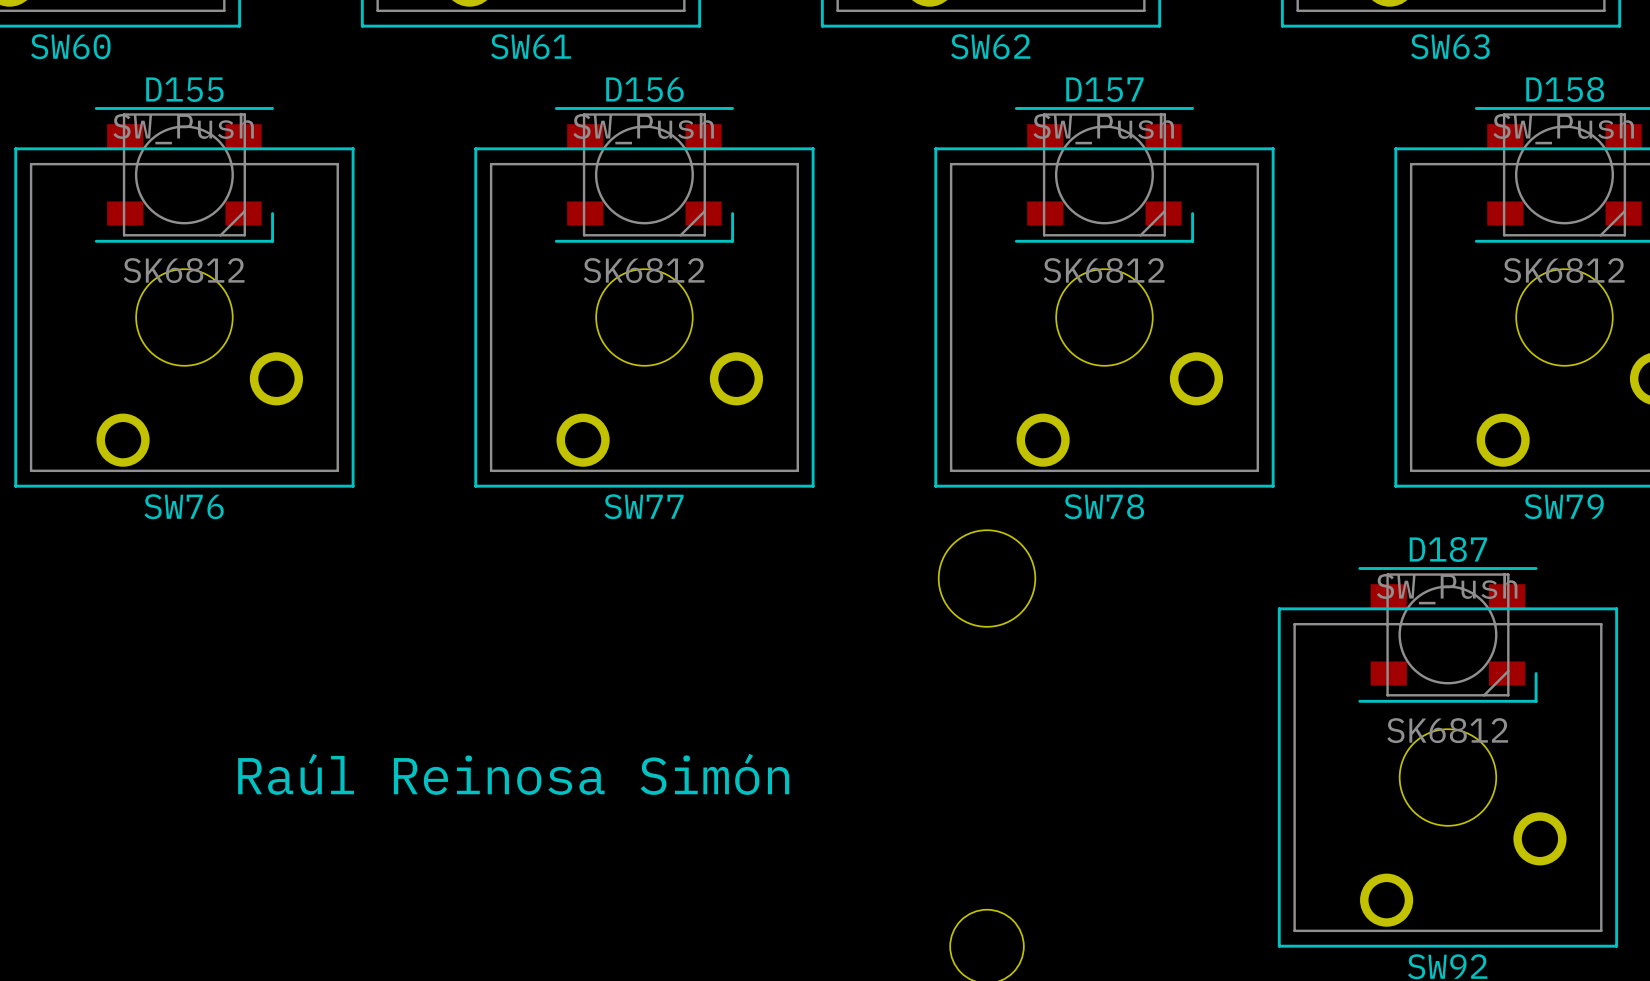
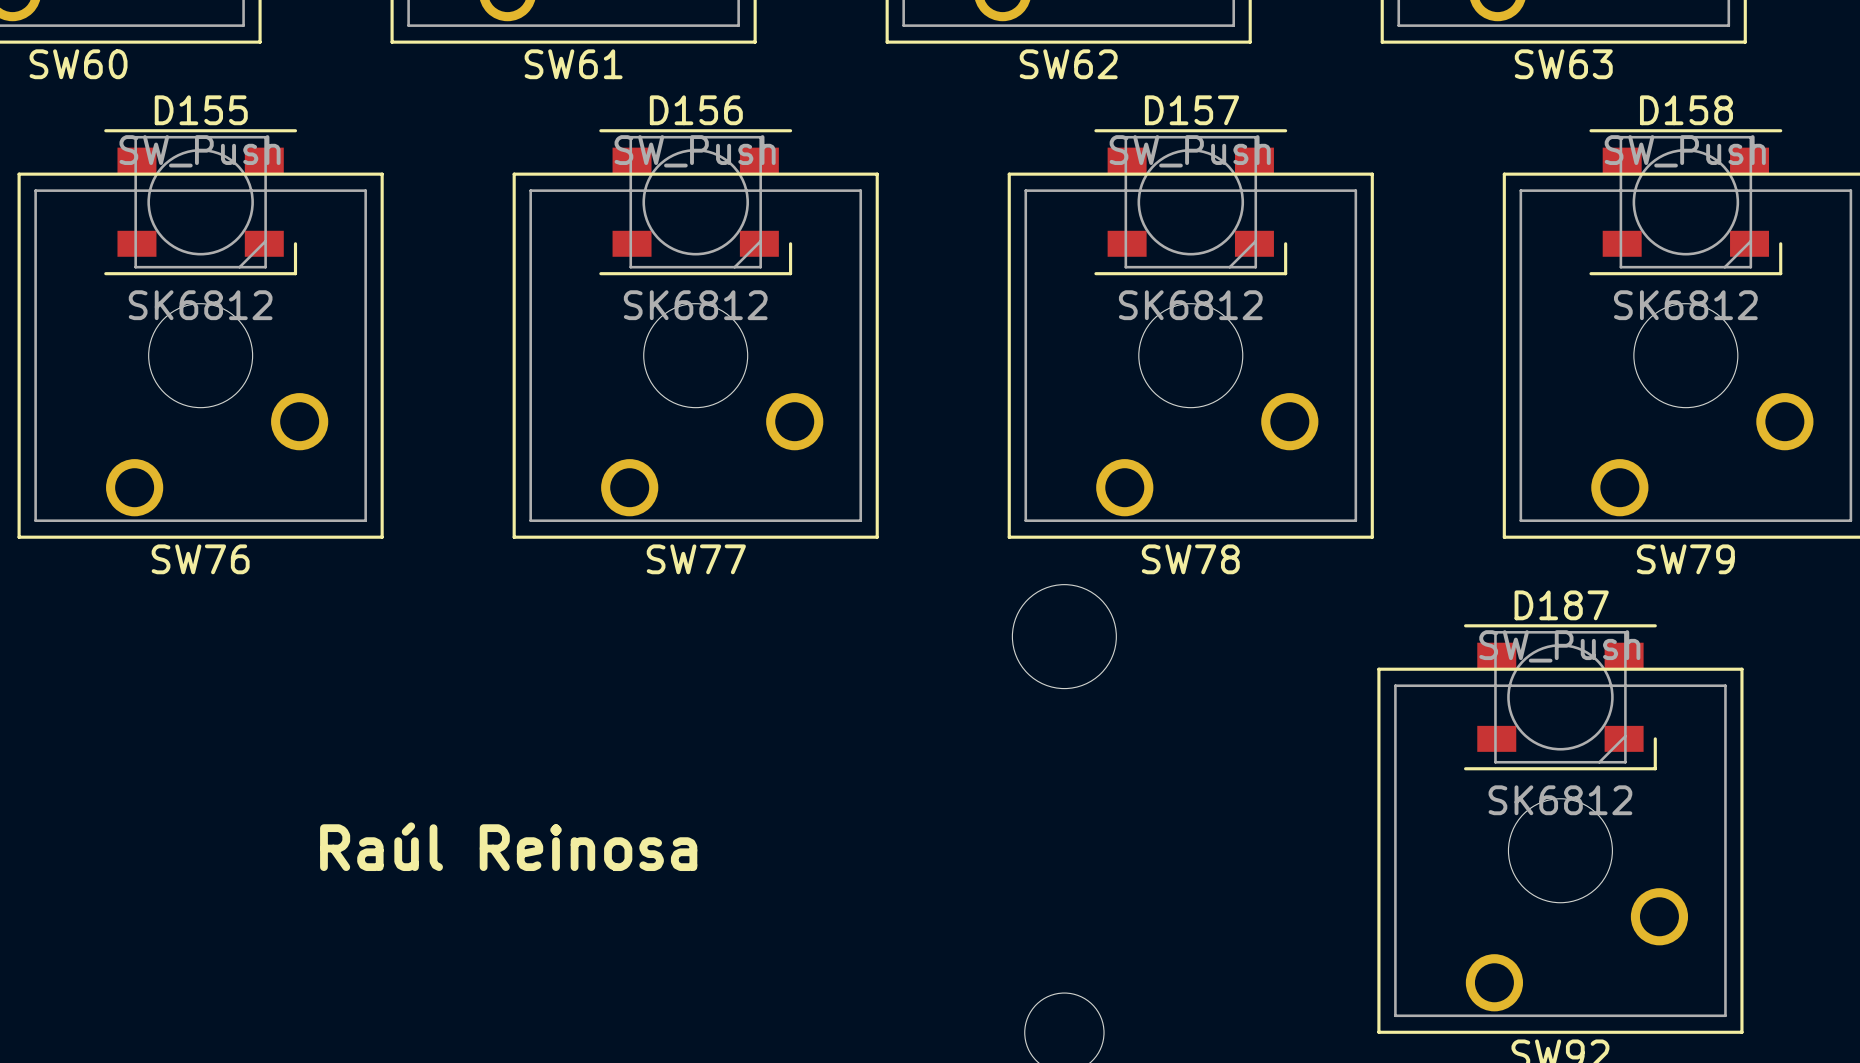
text: Raúl Reinosa Simón (513, 774) -> Raúl Reinosa (508, 846)

